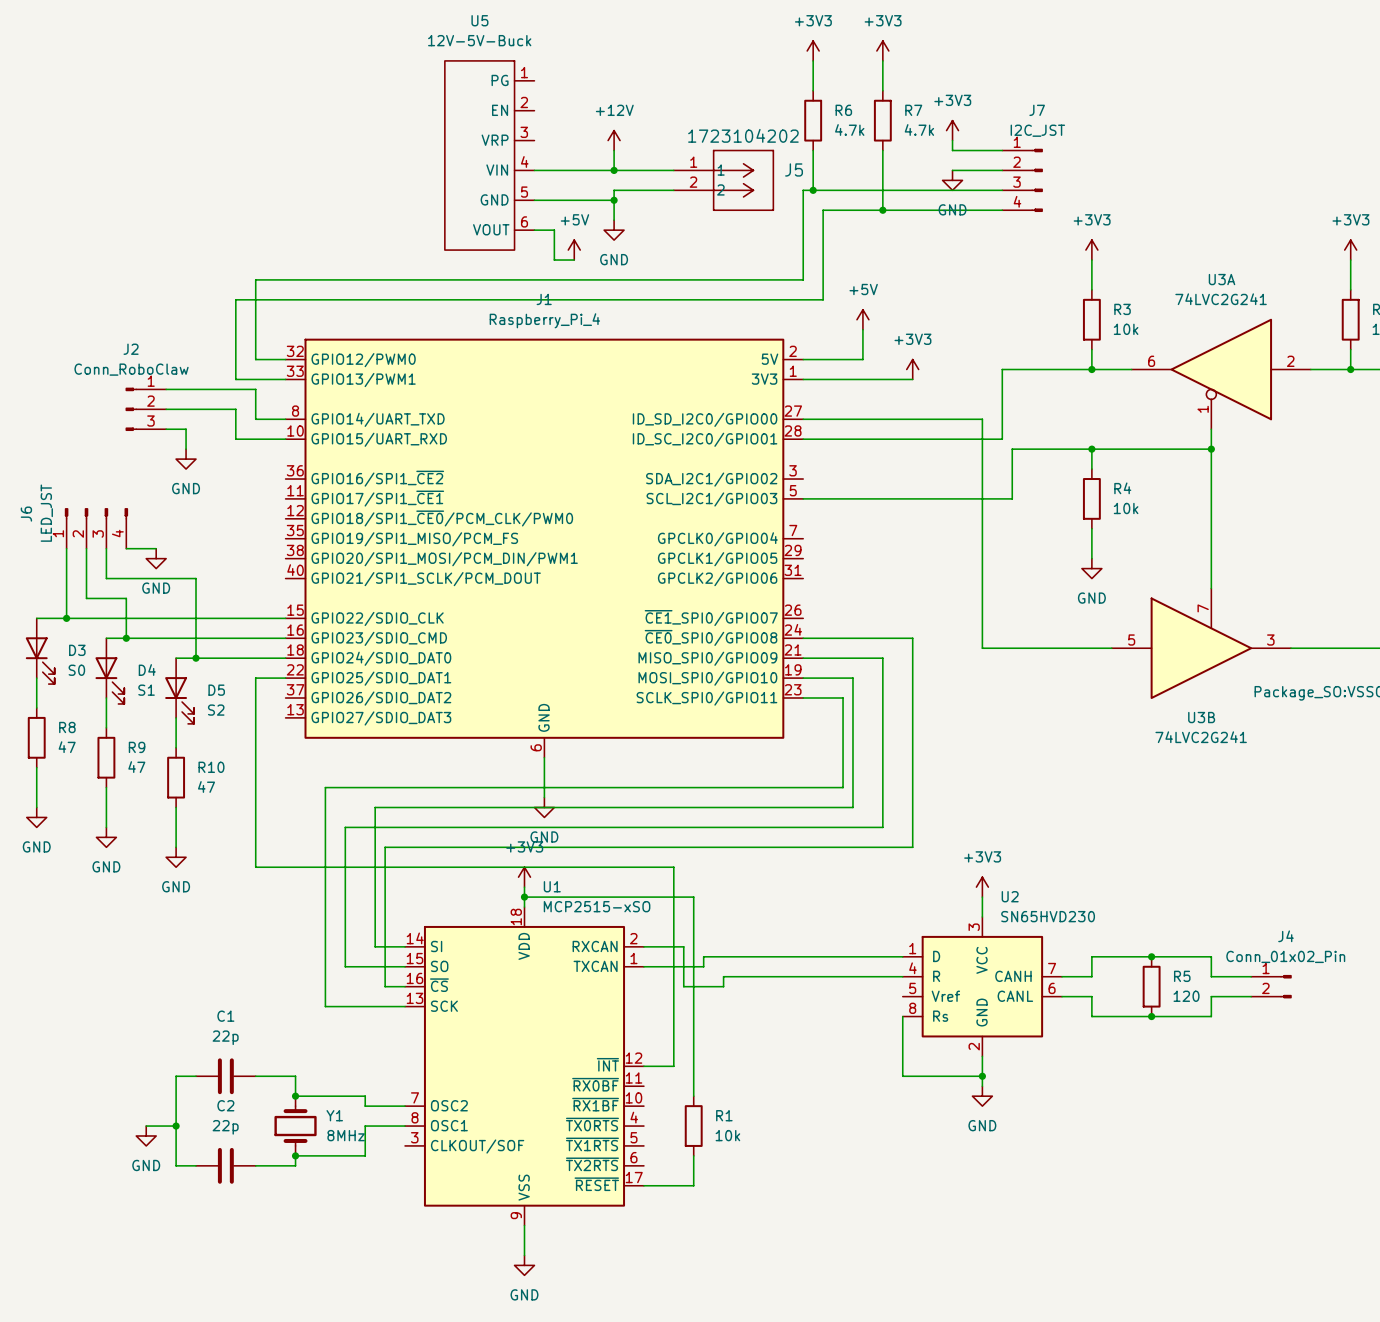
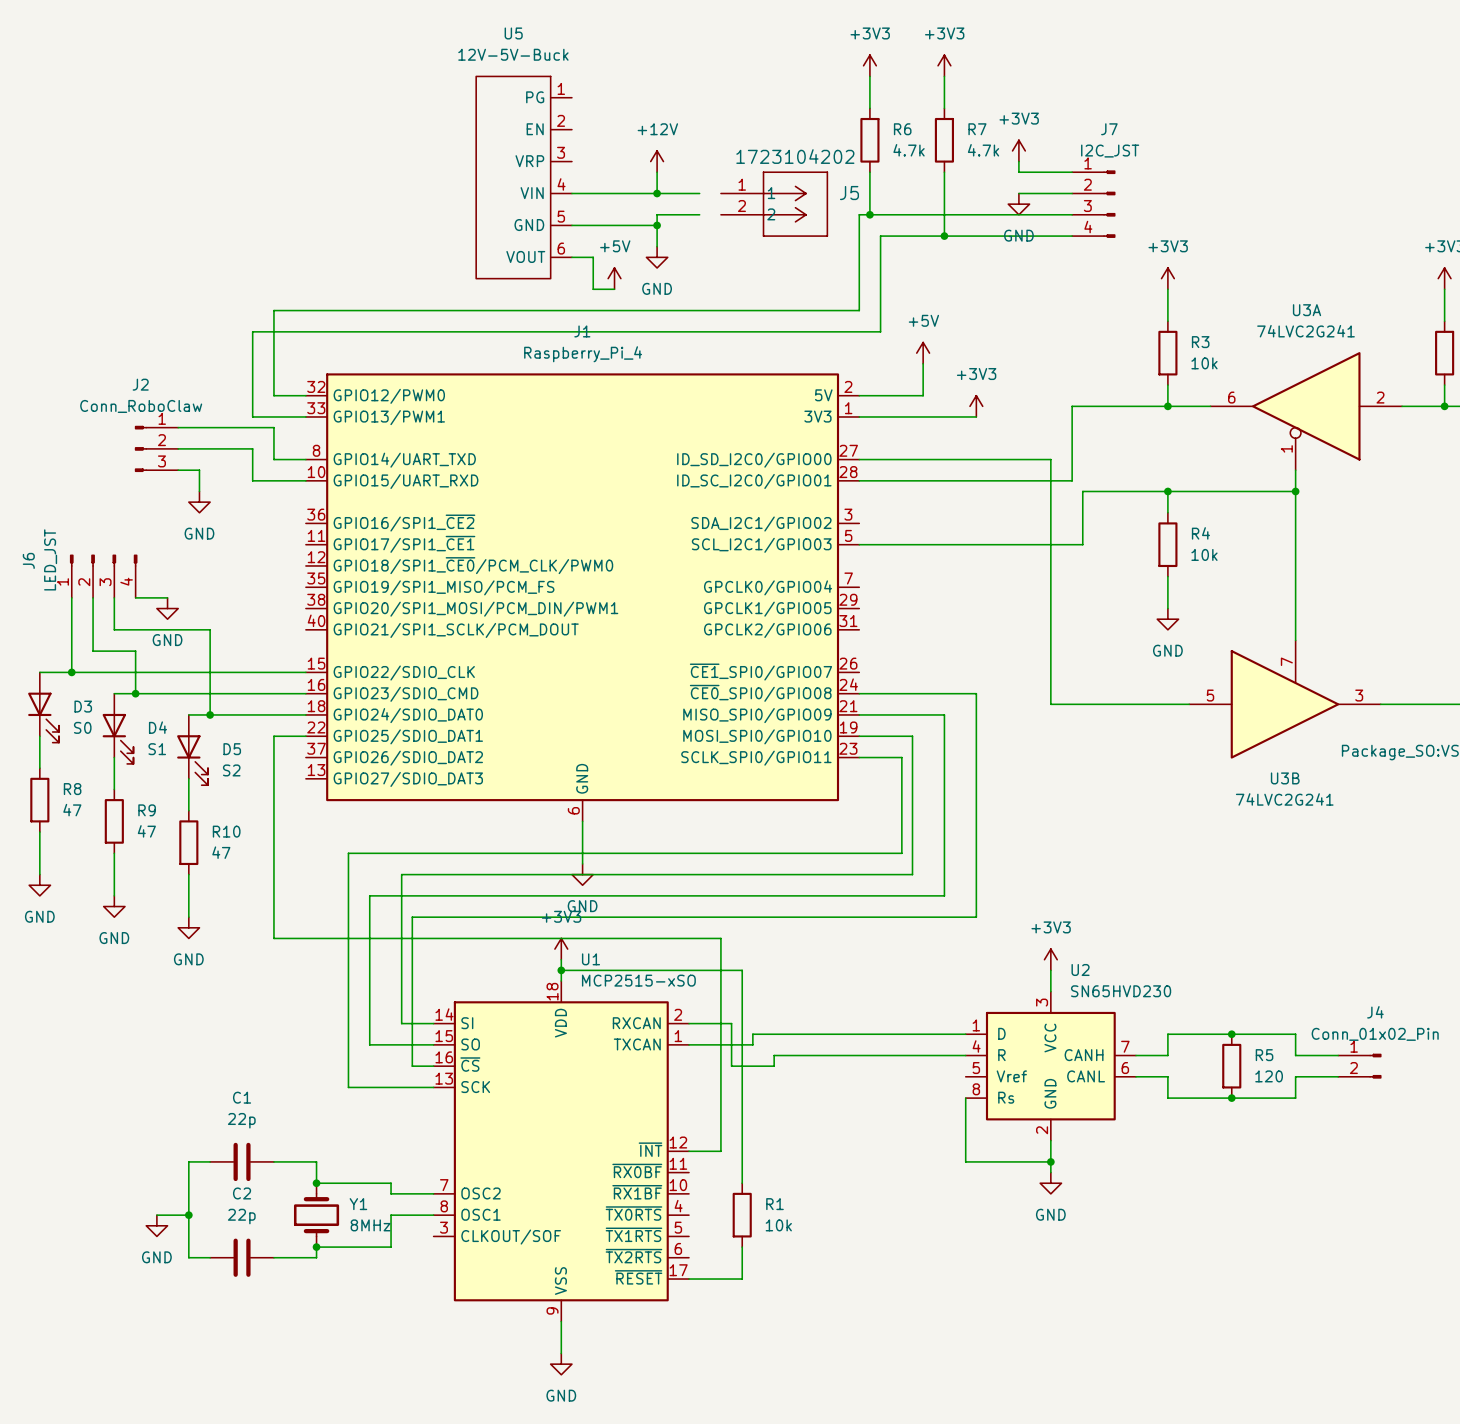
wire: (653, 170) (673, 170) -> none
wire: (653, 190) (673, 190) -> none

